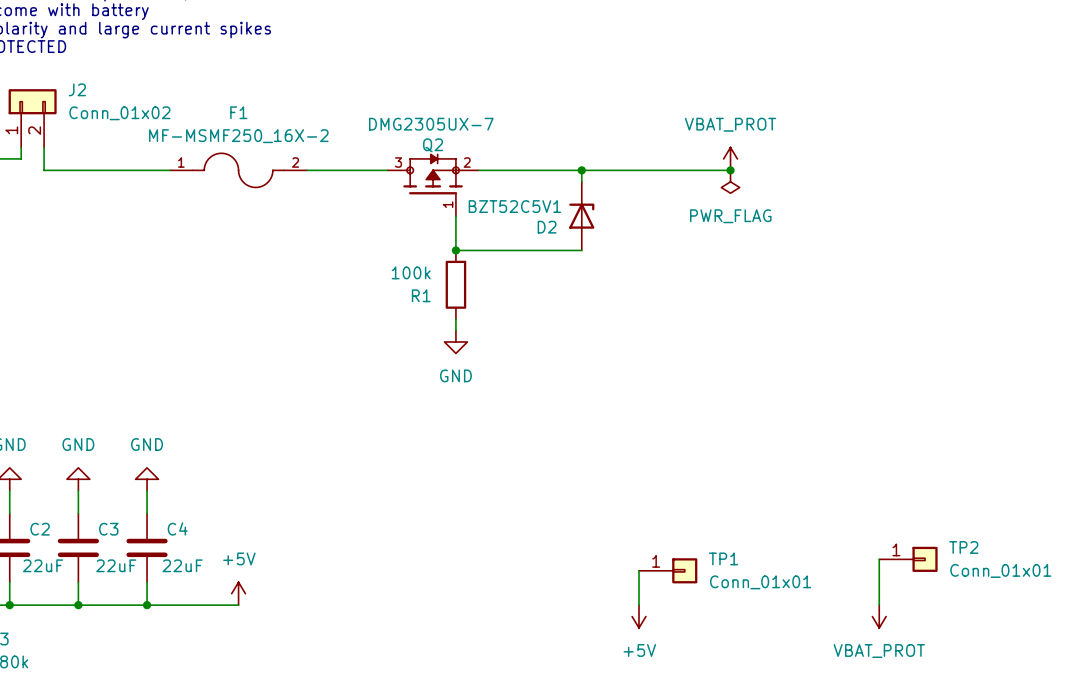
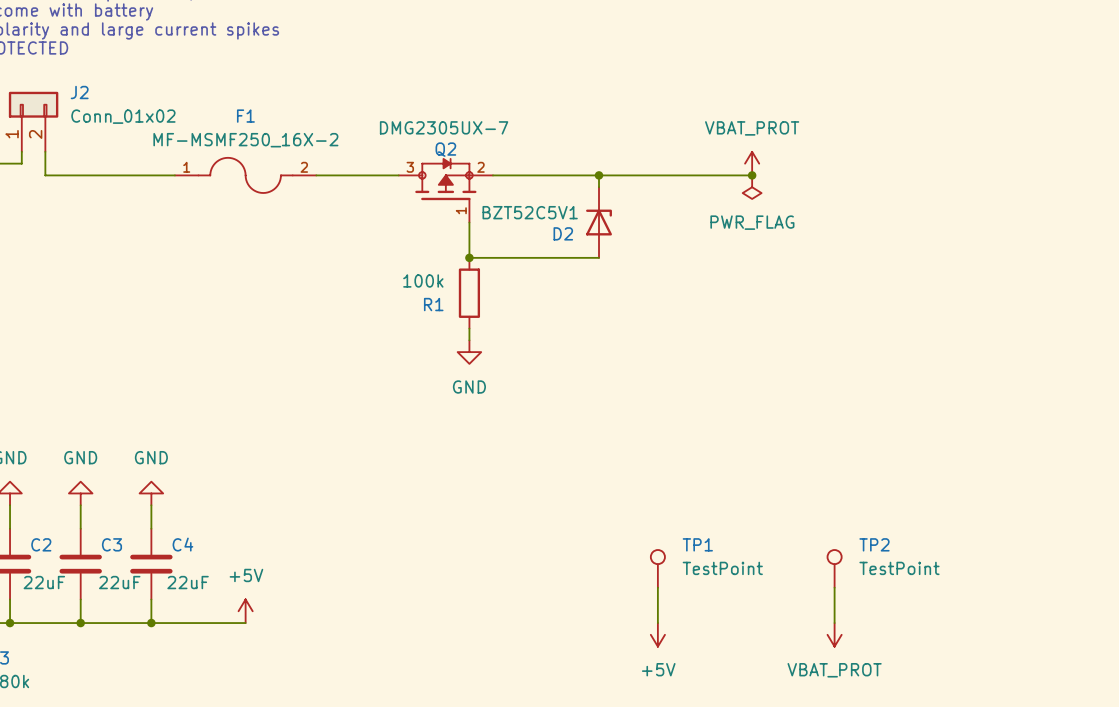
TP2 symbol: [879, 546, 938, 572] -> [827, 550, 842, 588]
TP2 name position: TP2 (963, 547) -> TP2 (874, 544)
TP1 symbol: [639, 558, 698, 584] -> [650, 550, 665, 588]
TP1 name position: TP1 (723, 558) -> TP1 (697, 544)
wire: (879, 559) (879, 605) -> none
wire: none -> (834, 587) (834, 623)
TP2 value: Conn_01x01 (1000, 570) -> TestPoint (899, 568)
TP1 value: Conn_01x01 (760, 582) -> TestPoint (722, 568)
power symbol position: VBAT_PROT (879, 616) -> VBAT_PROT (834, 634)

